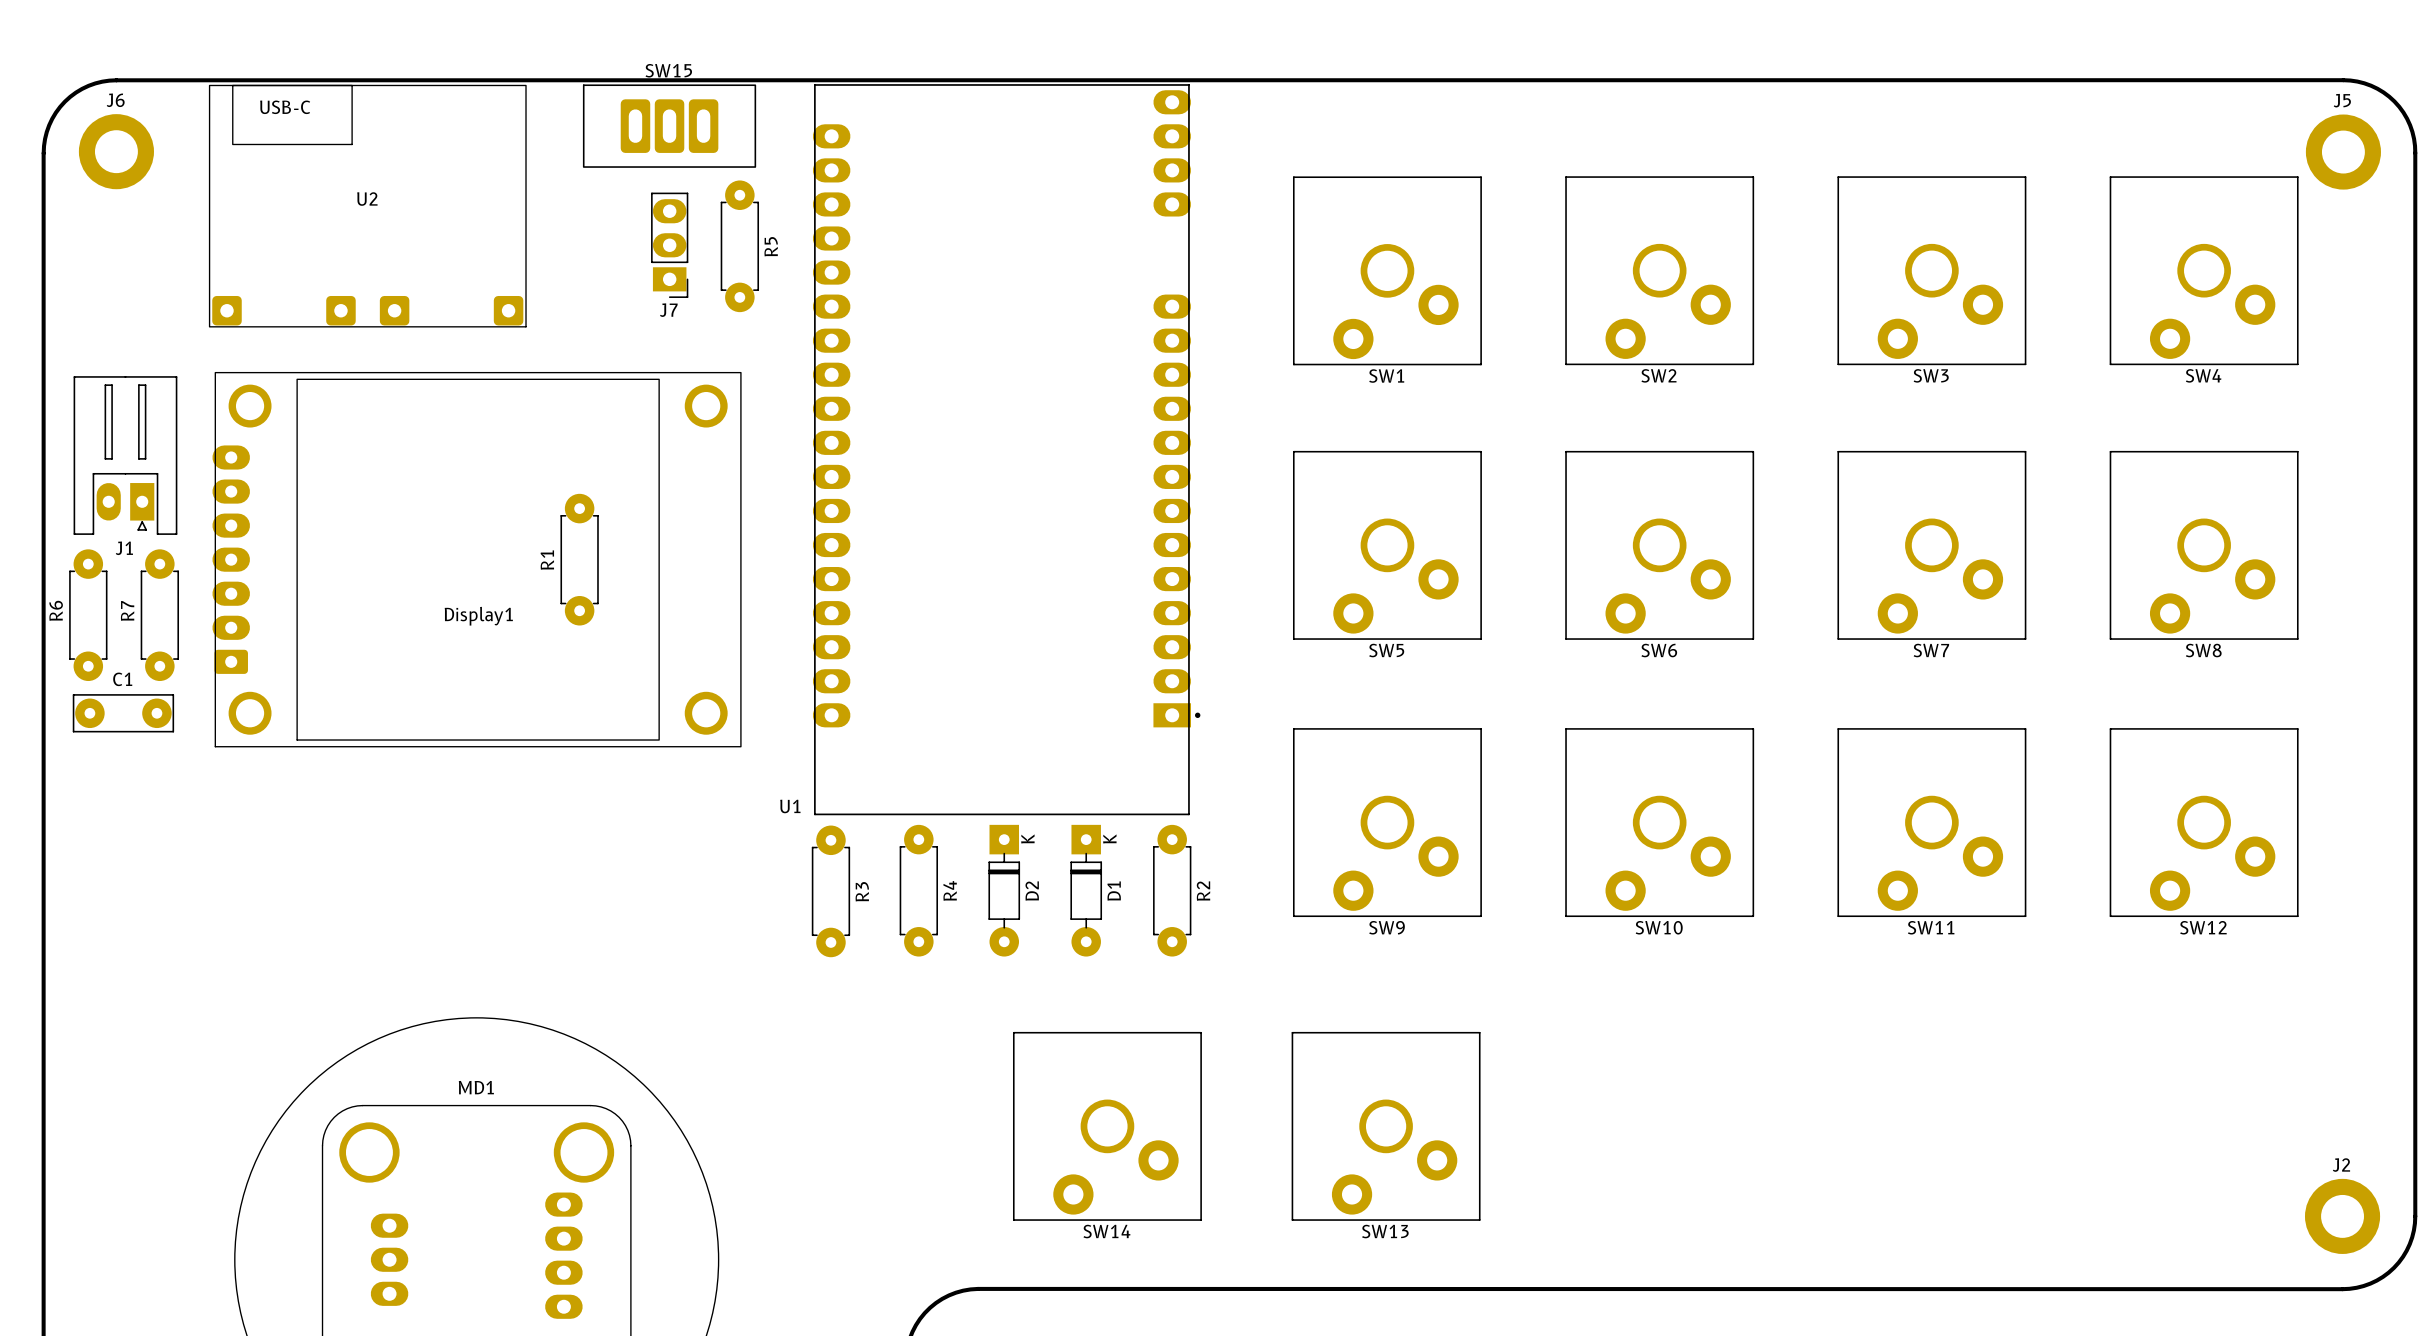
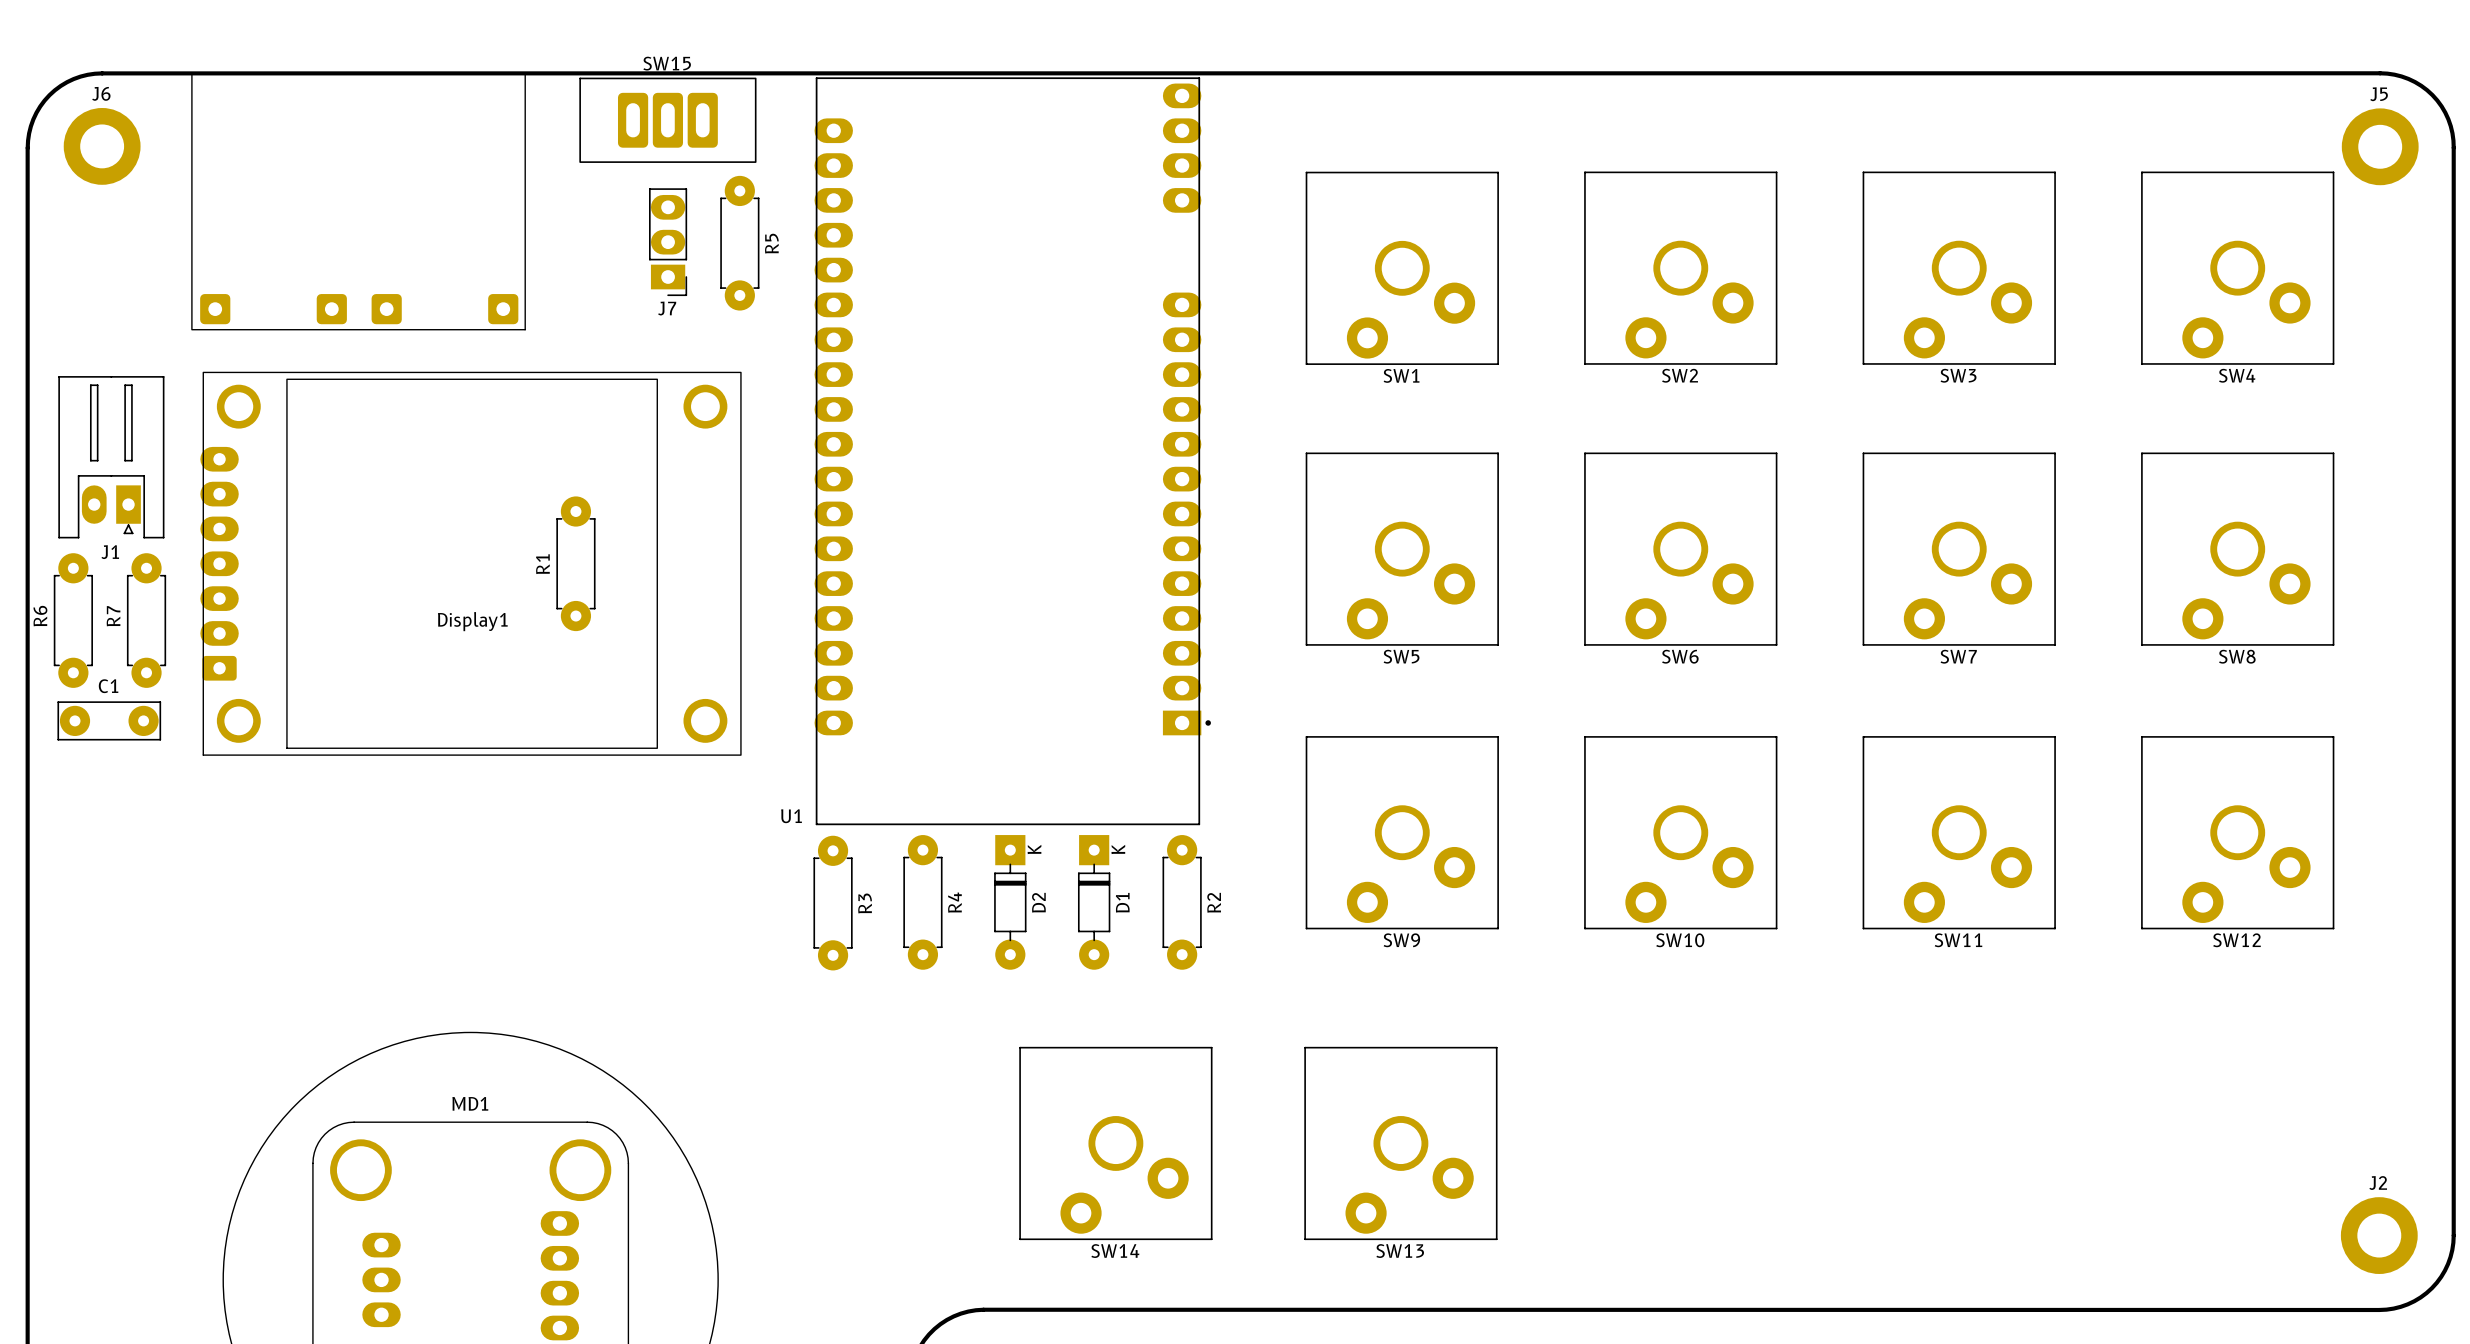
part: none -> (358, 201)
U2: (367, 206) -> none

